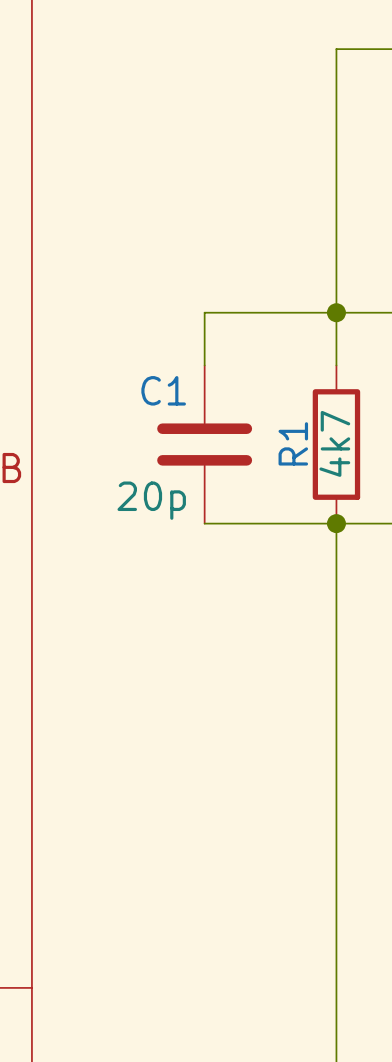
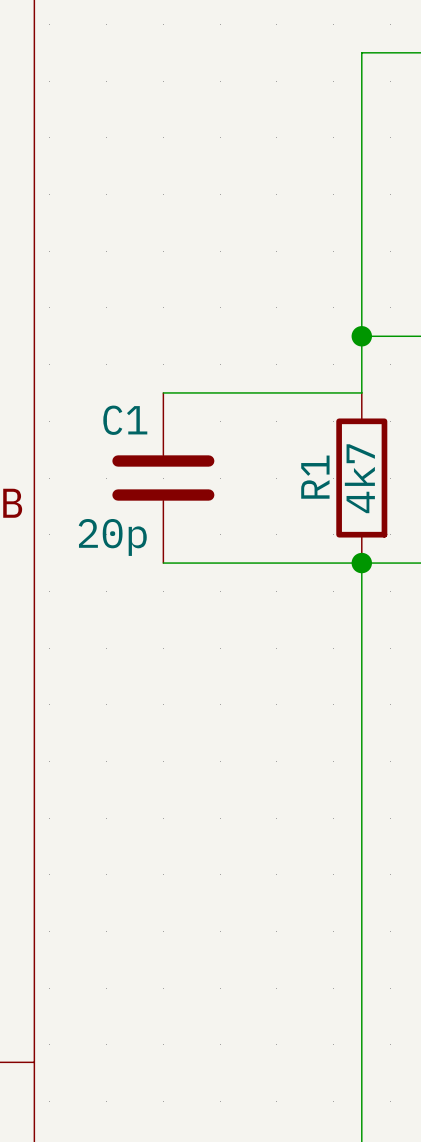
wire: (336, 312) (204, 312) (204, 365) -> none
wire: none -> (163, 392) (361, 392)
C1 position: (204, 444) -> (163, 478)
wire: none -> (163, 563) (220, 563)

